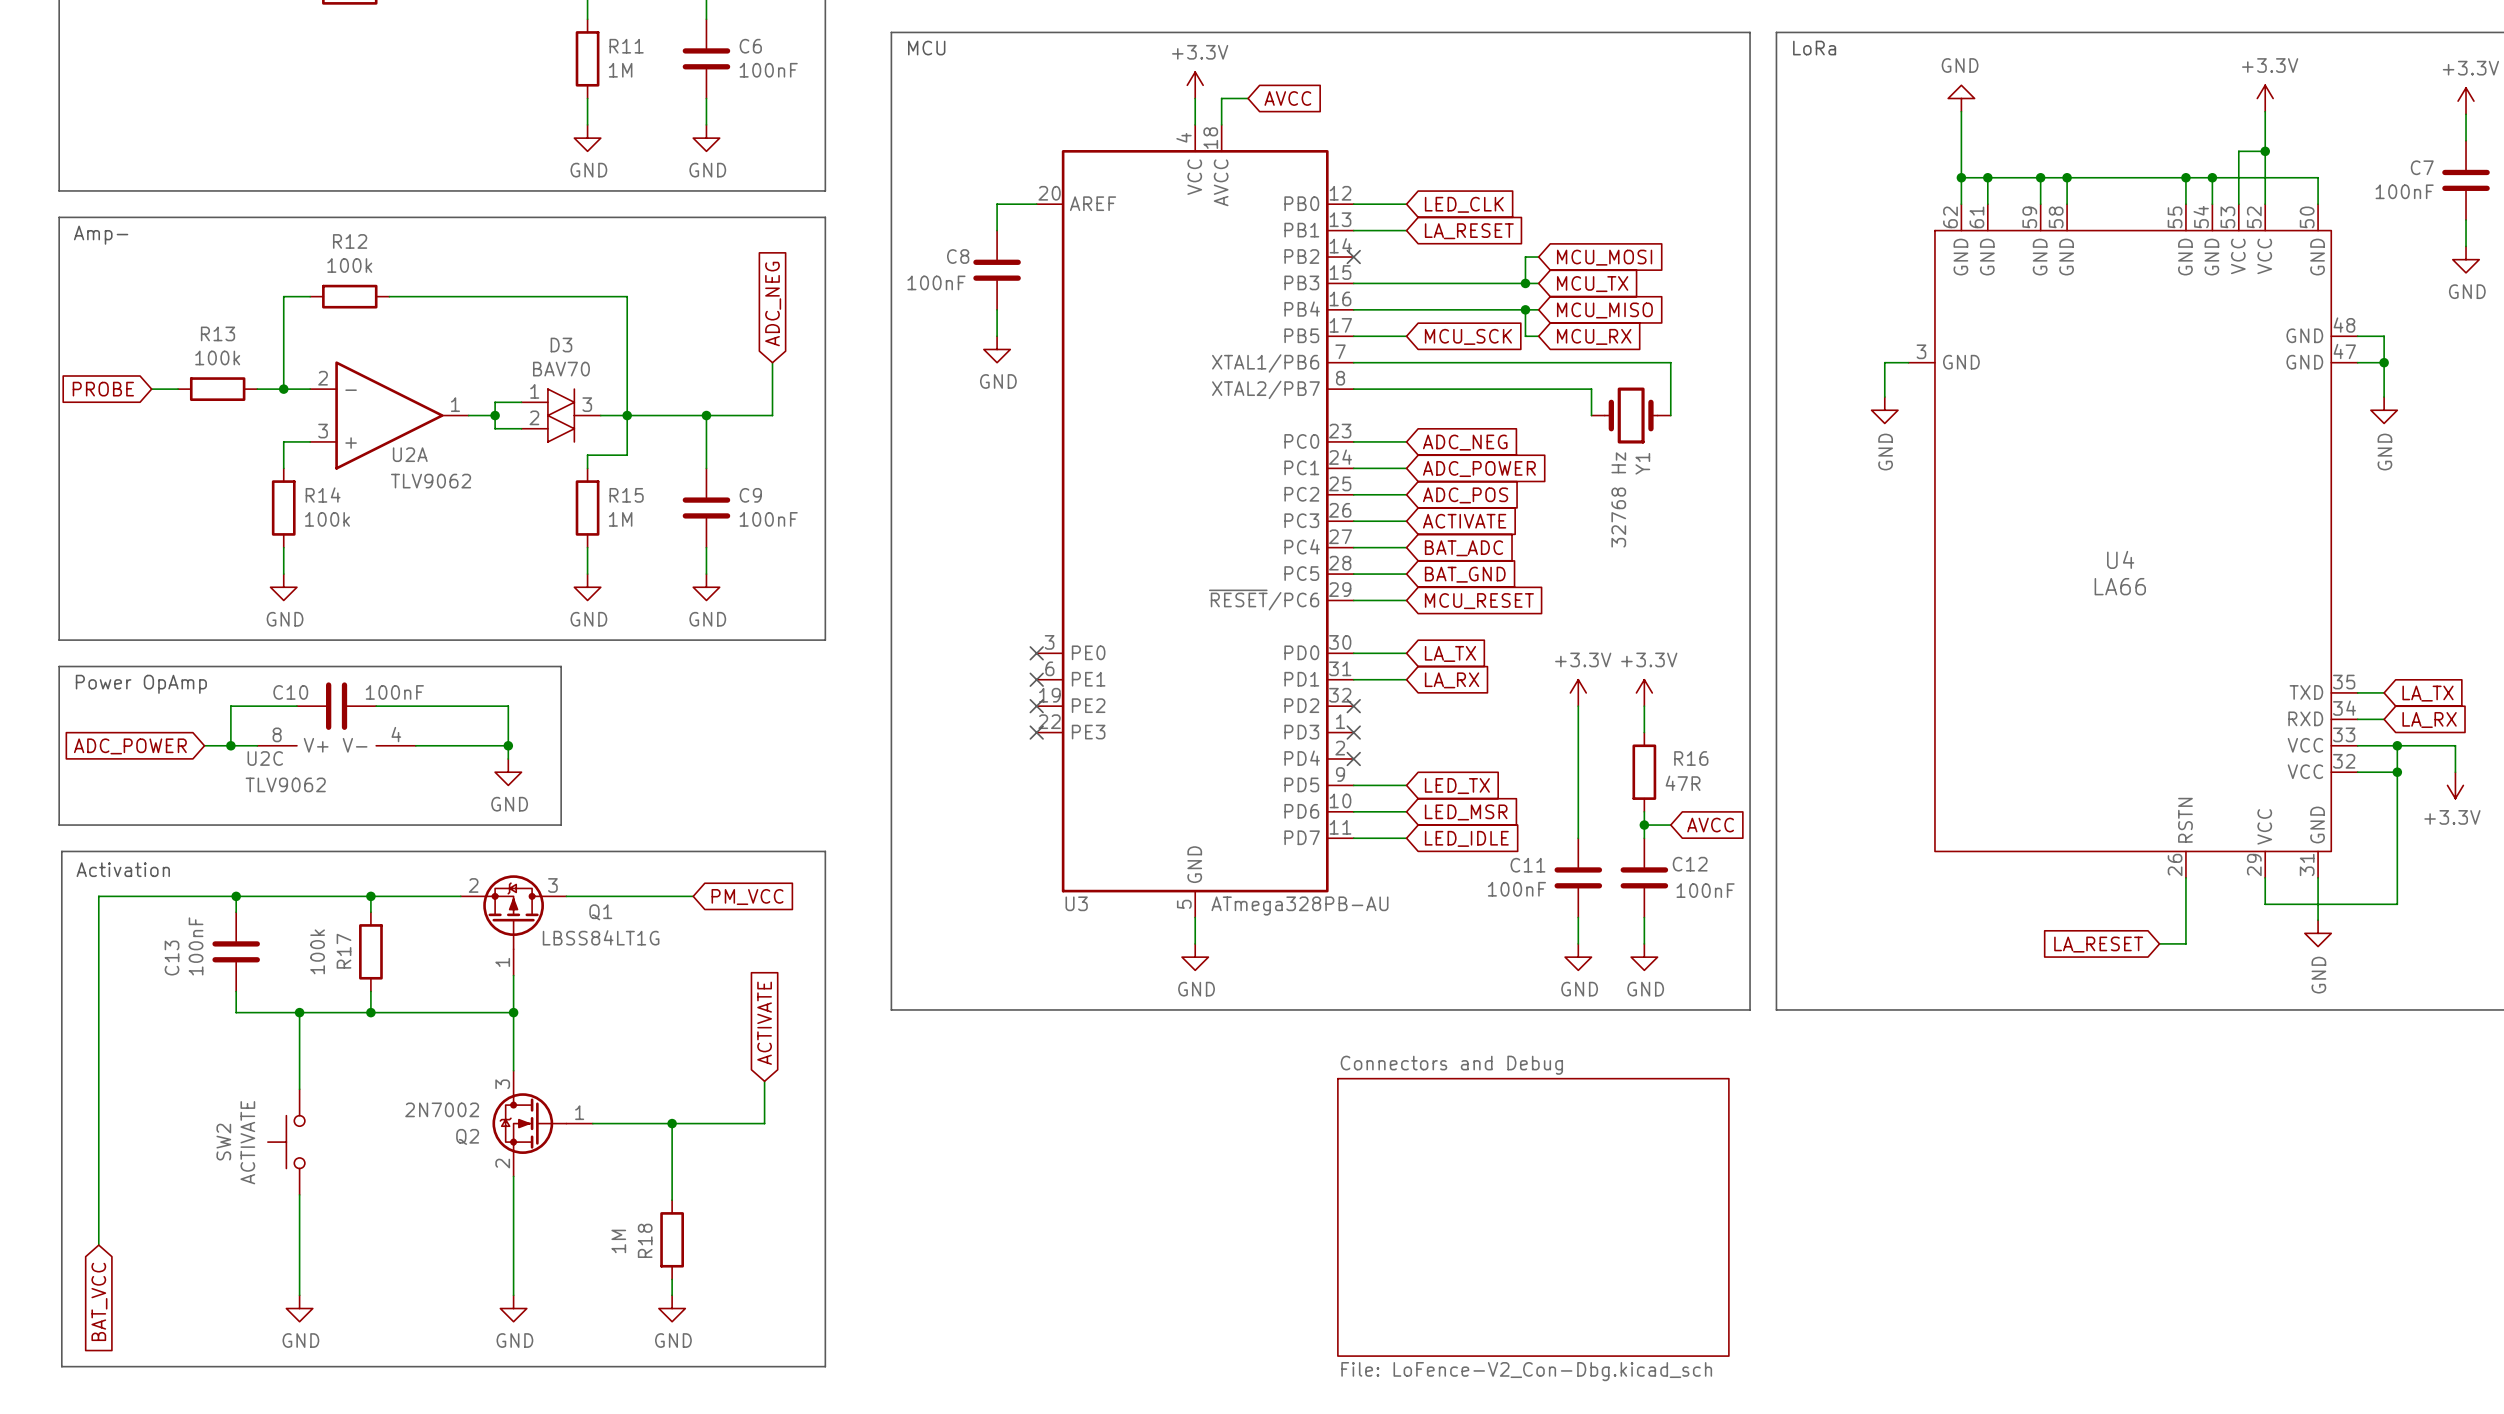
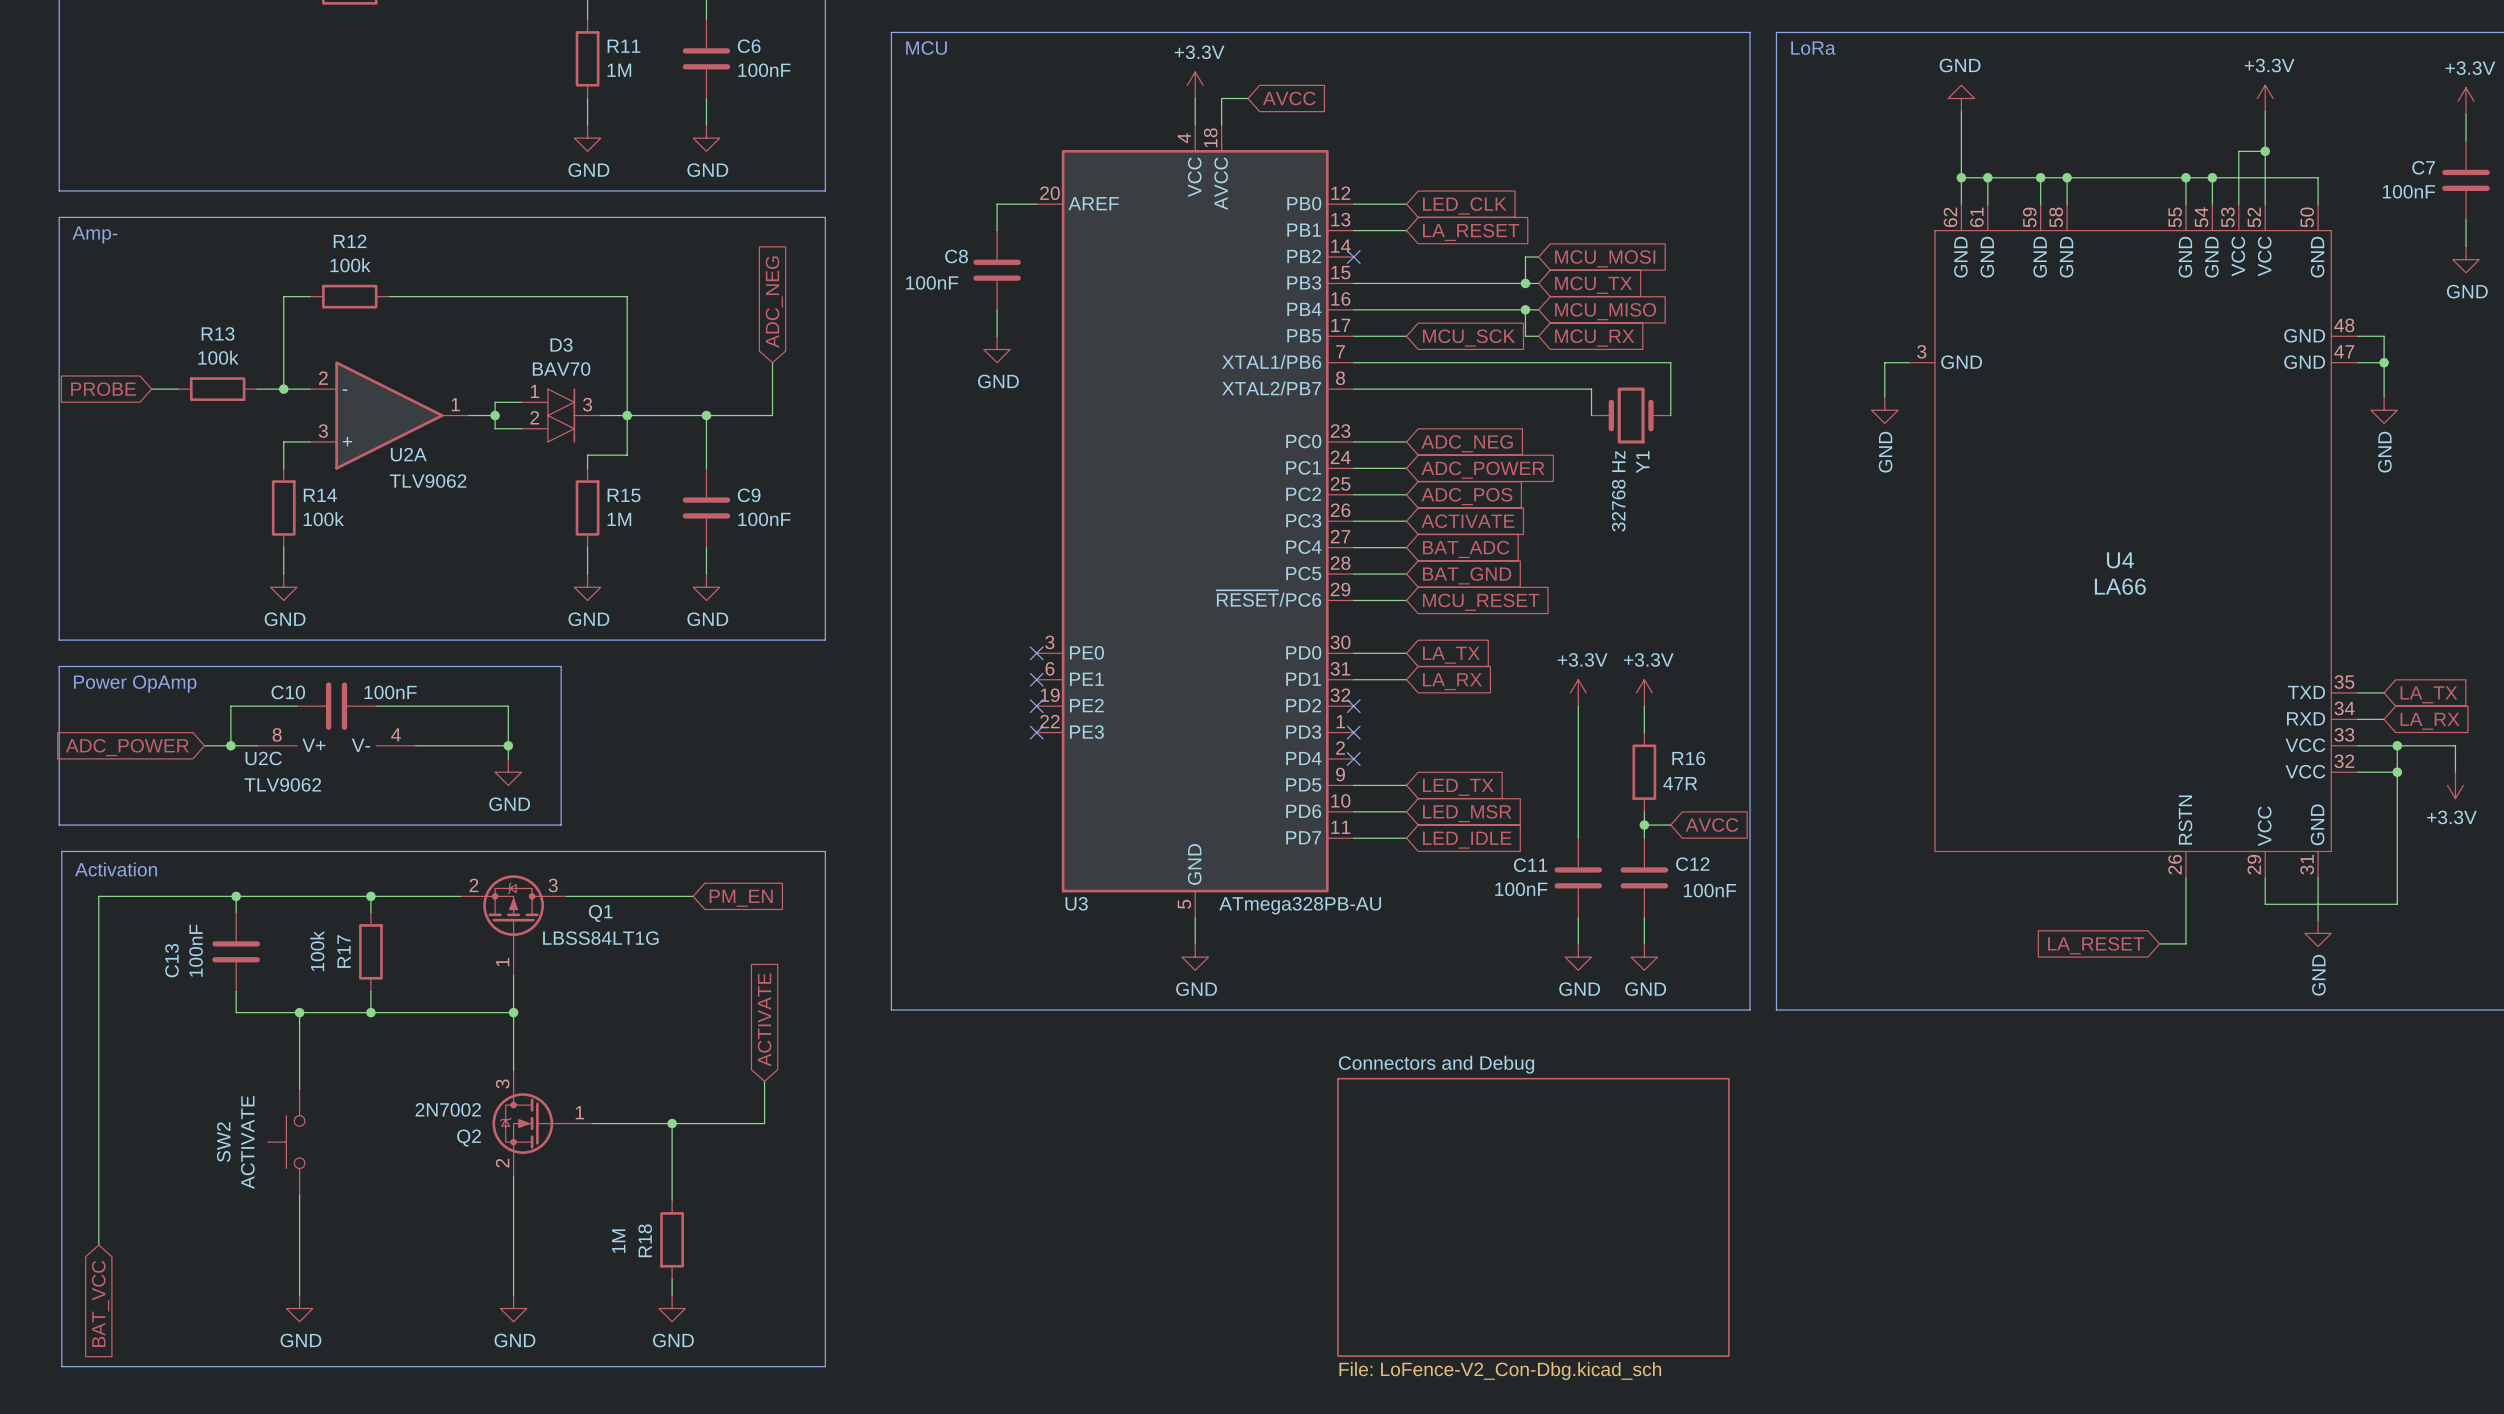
global label: PM_VCC (747, 897) -> PM_EN (741, 898)

